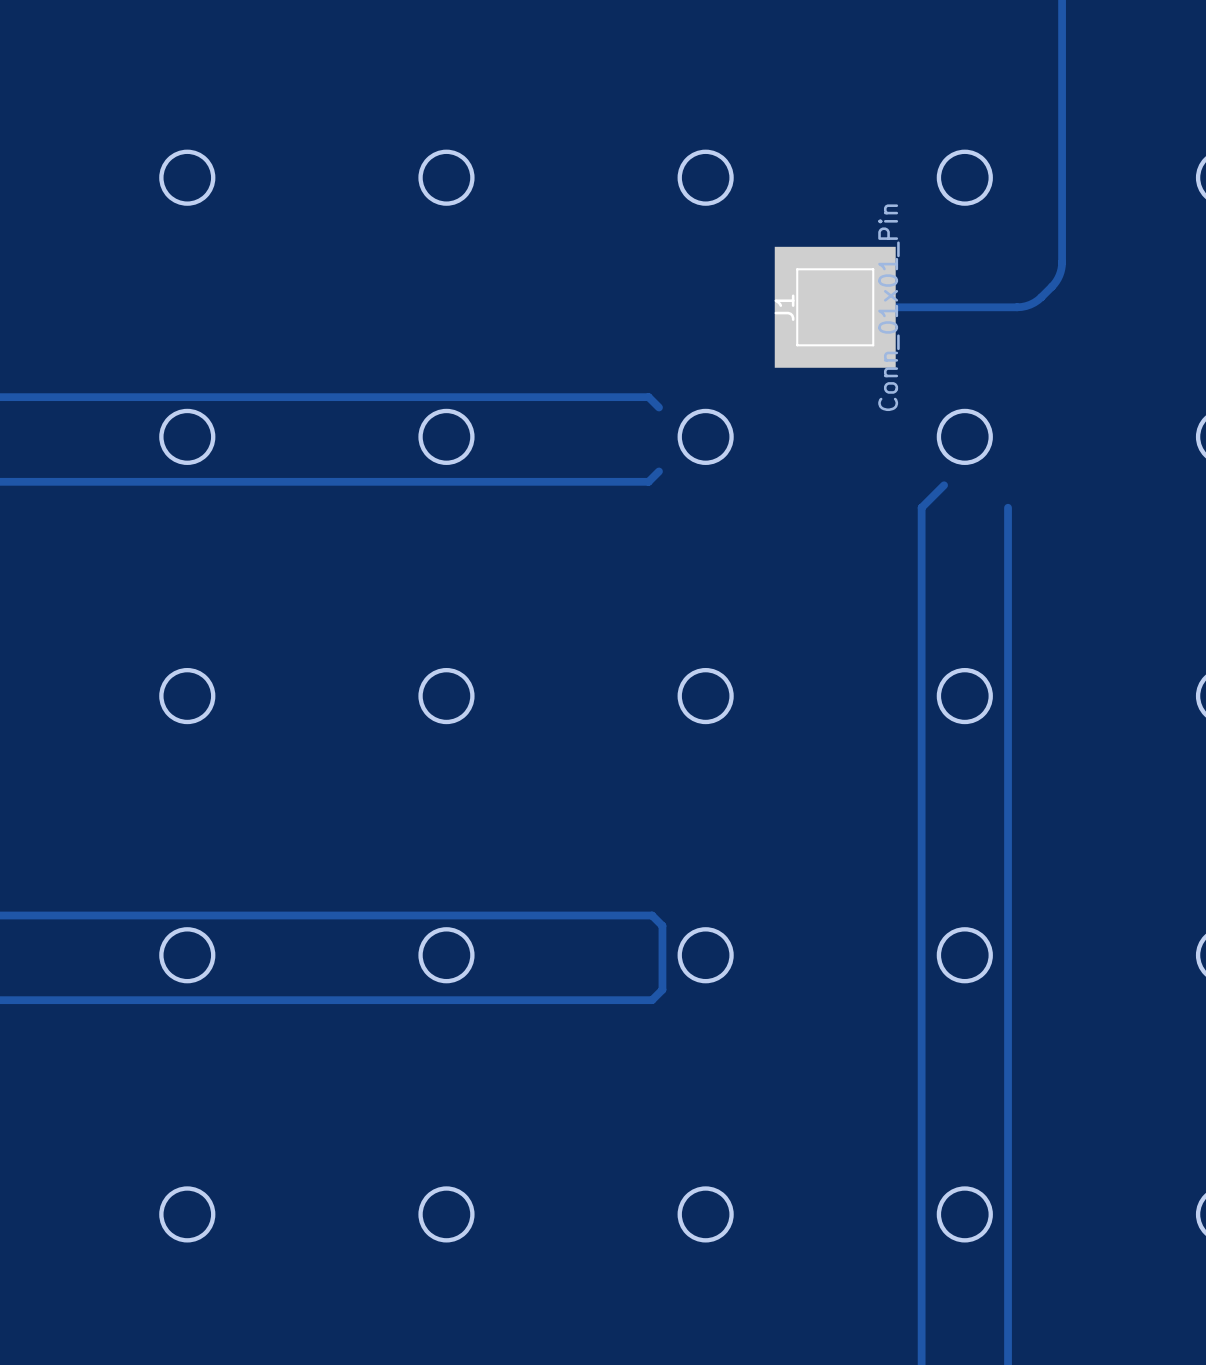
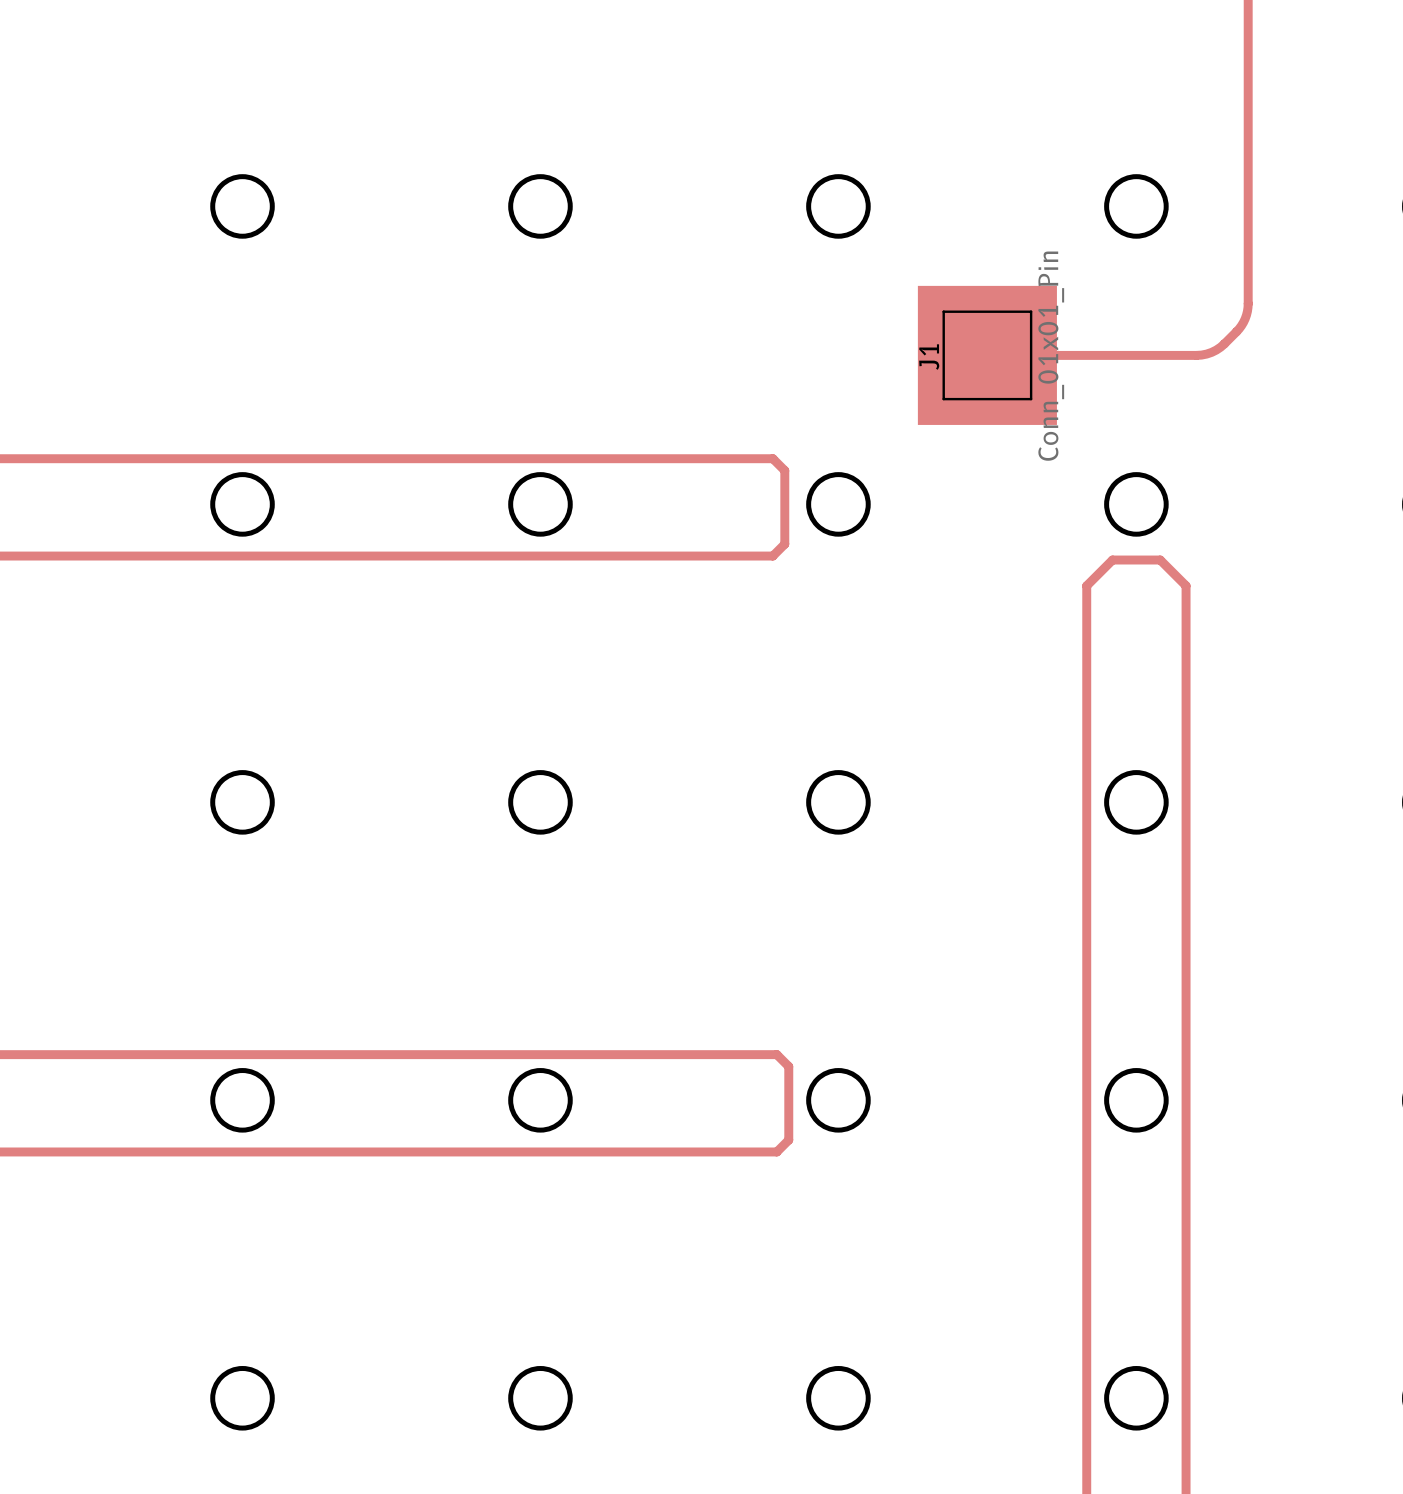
track: none -> (784, 470) (784, 544)
track: none -> (1112, 560) (1160, 560) (1186, 585)

